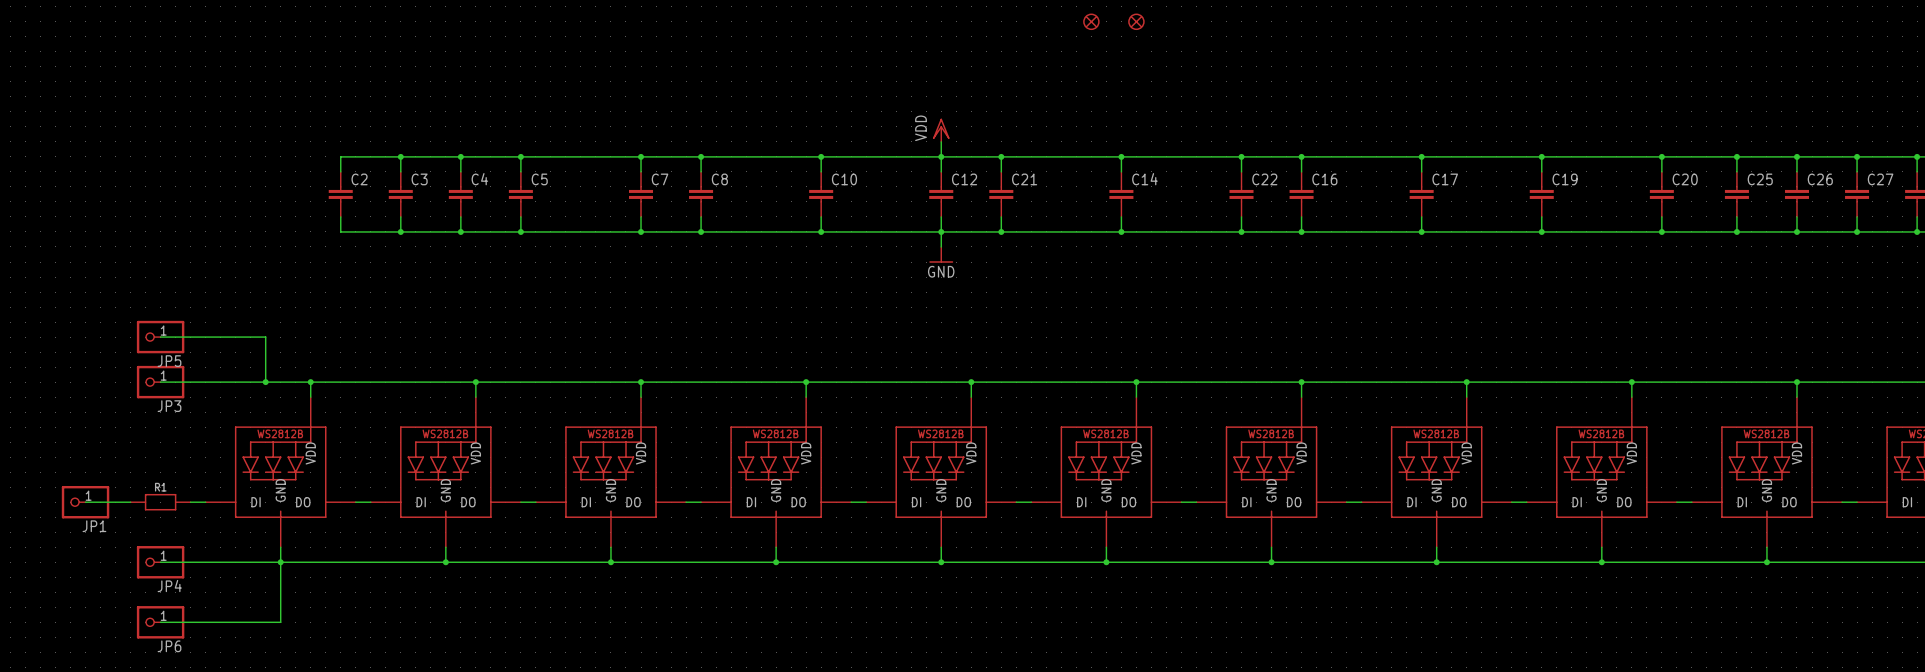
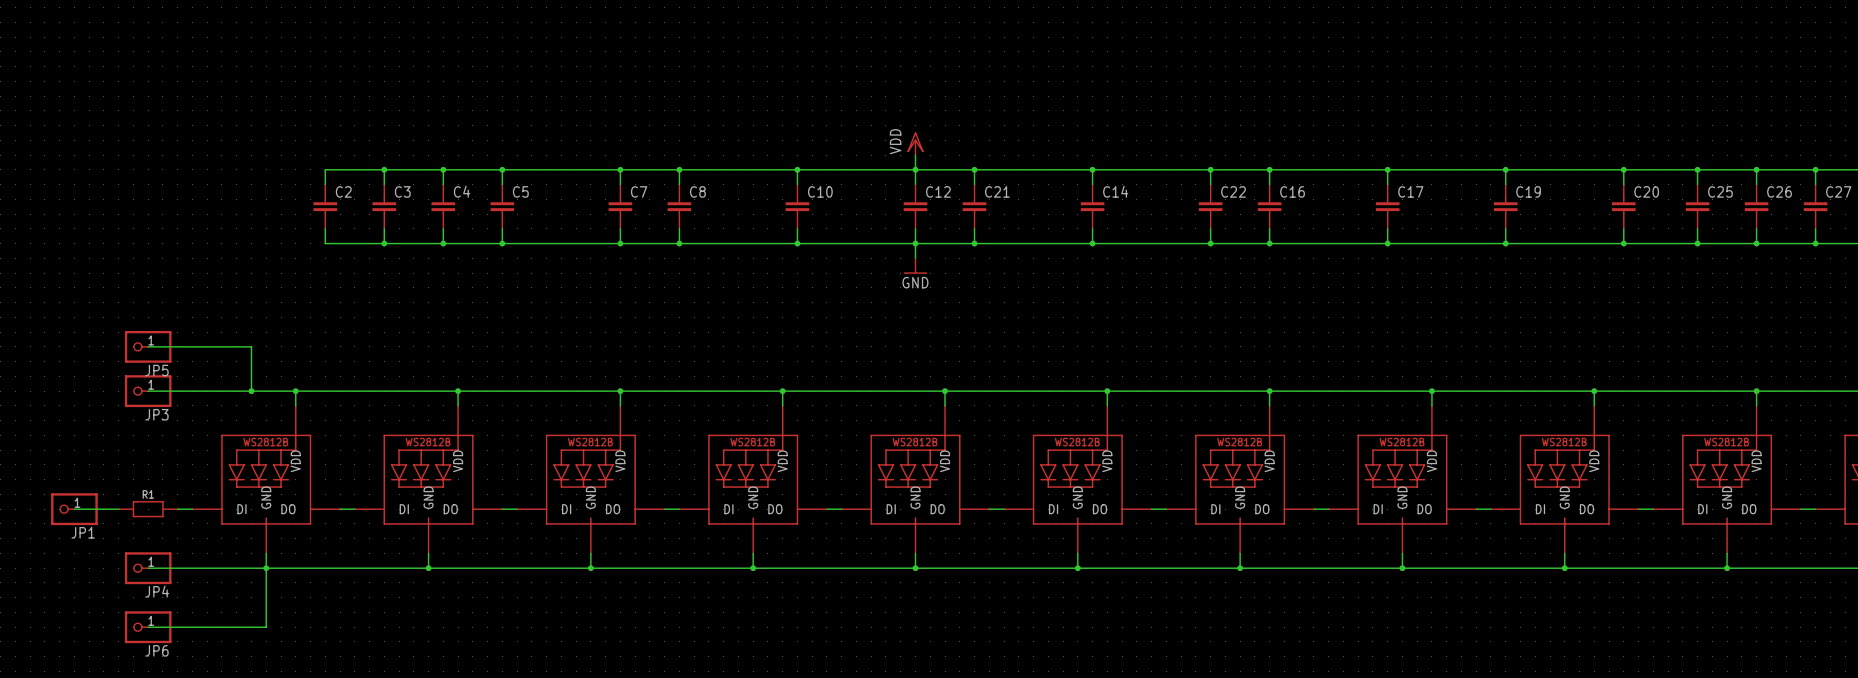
part: (1091, 21) -> none
part: (1136, 21) -> none

